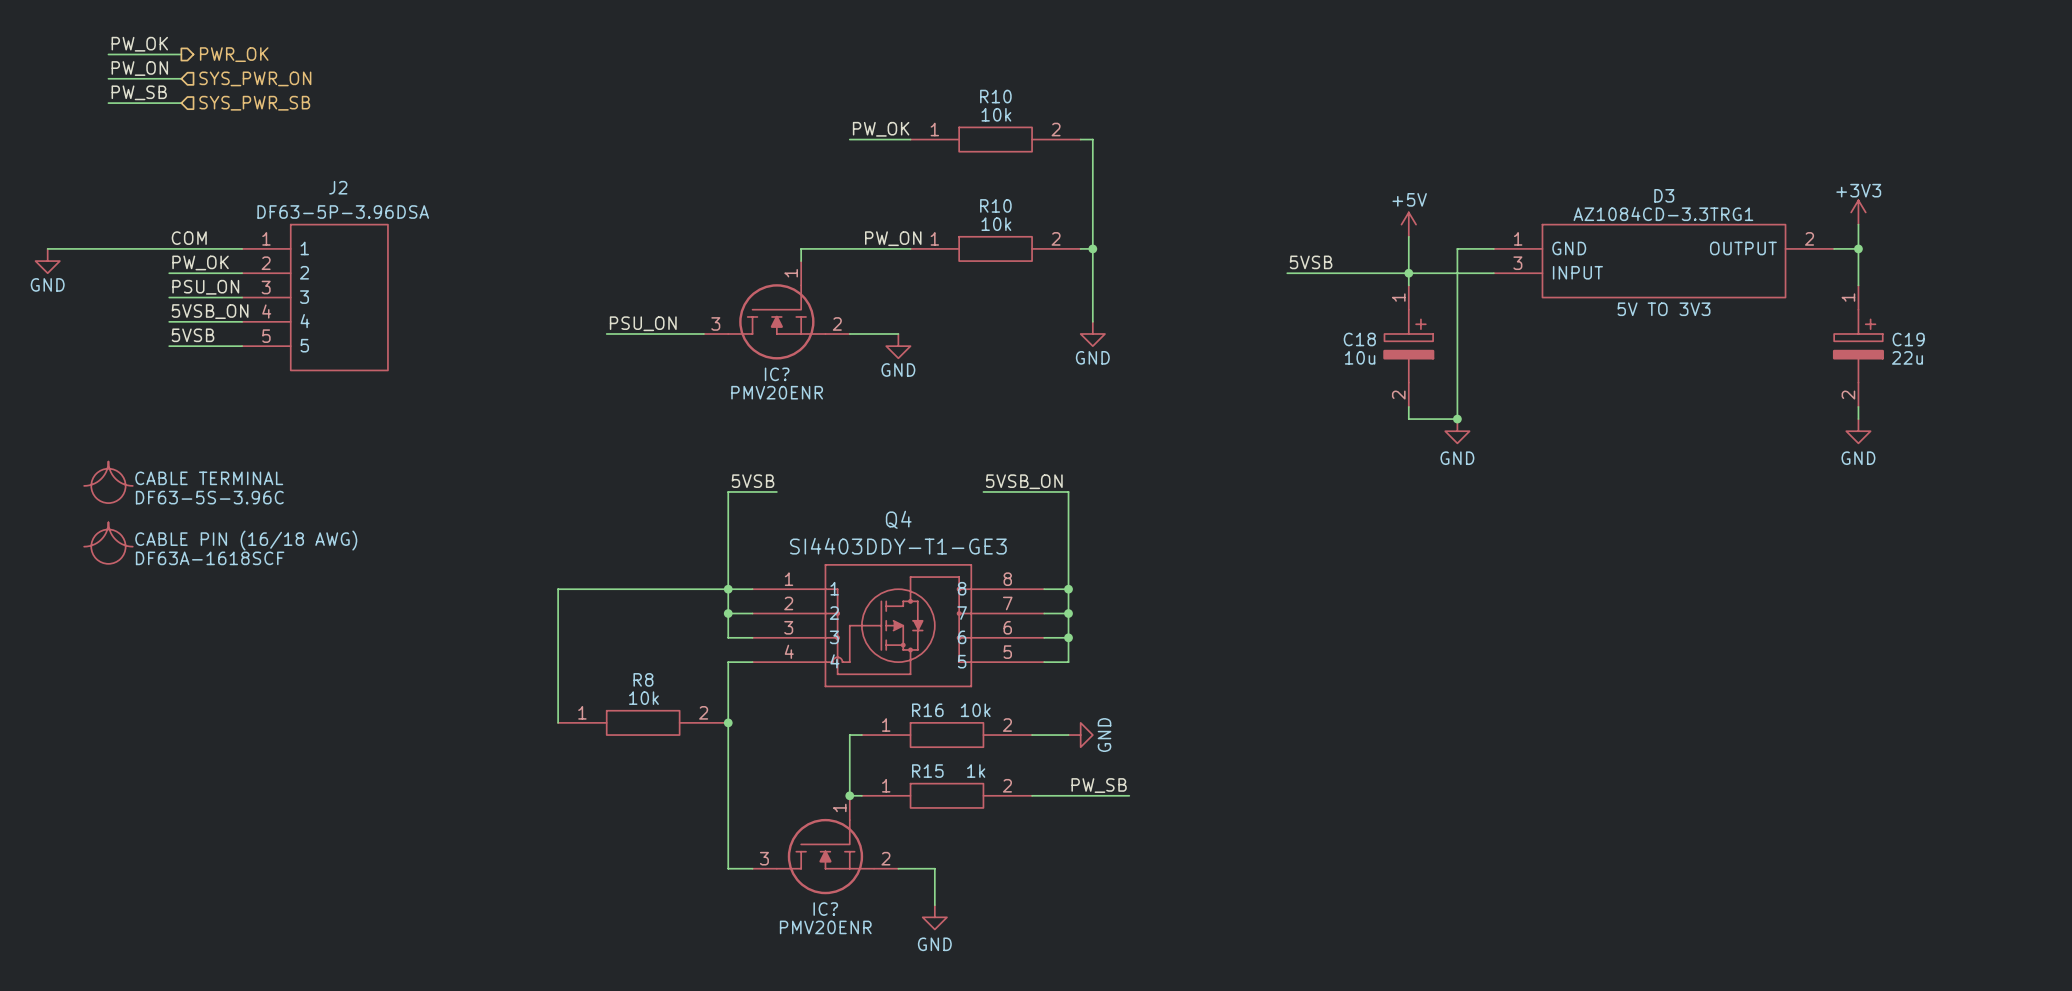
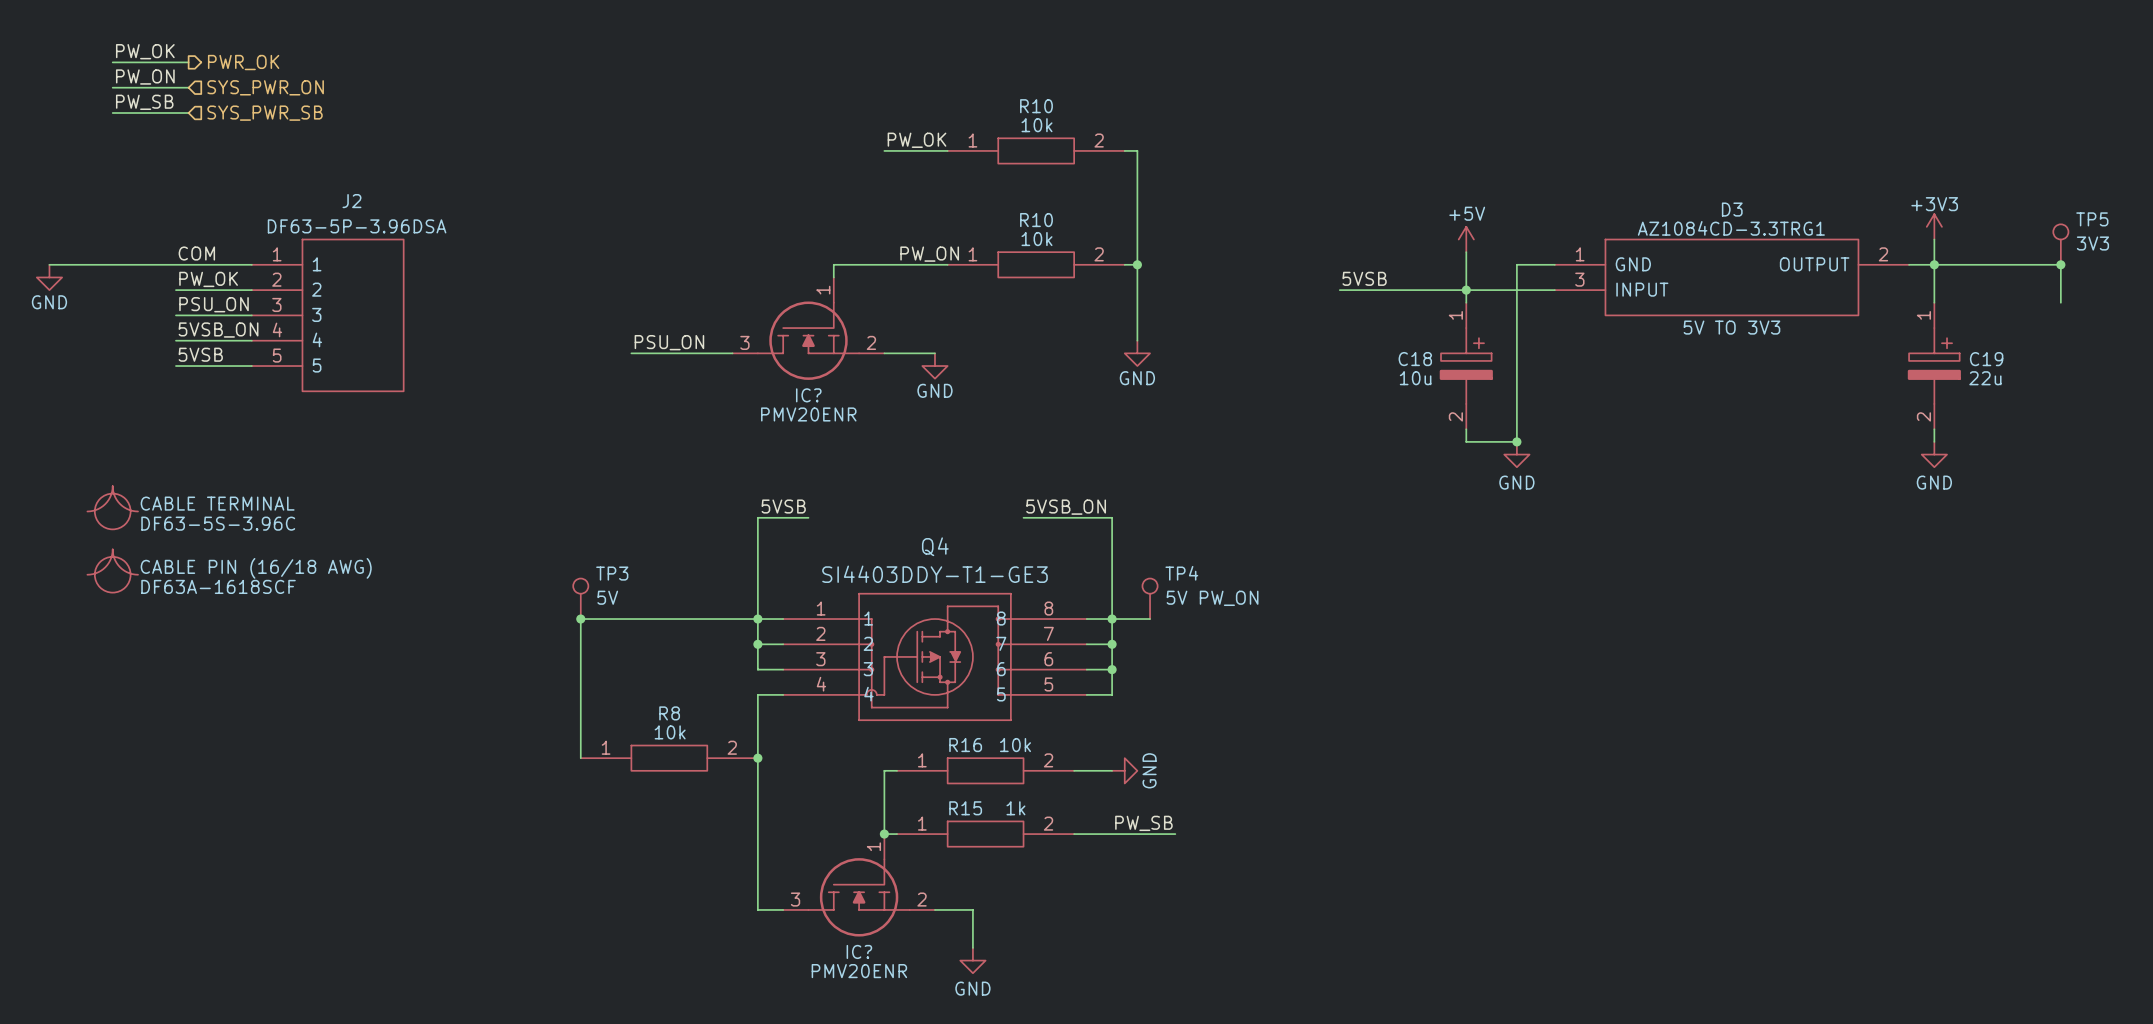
TP5: none -> 3V3 (2060, 244)
wire: none -> (1934, 264) (2060, 264) (2060, 302)
junction: none -> (2060, 264)
TP3: none -> 5V (580, 598)
TP4: none -> 5V PW_ON (1150, 598)
junction: none -> (580, 619)
wire: none -> (1112, 619) (1150, 619)

